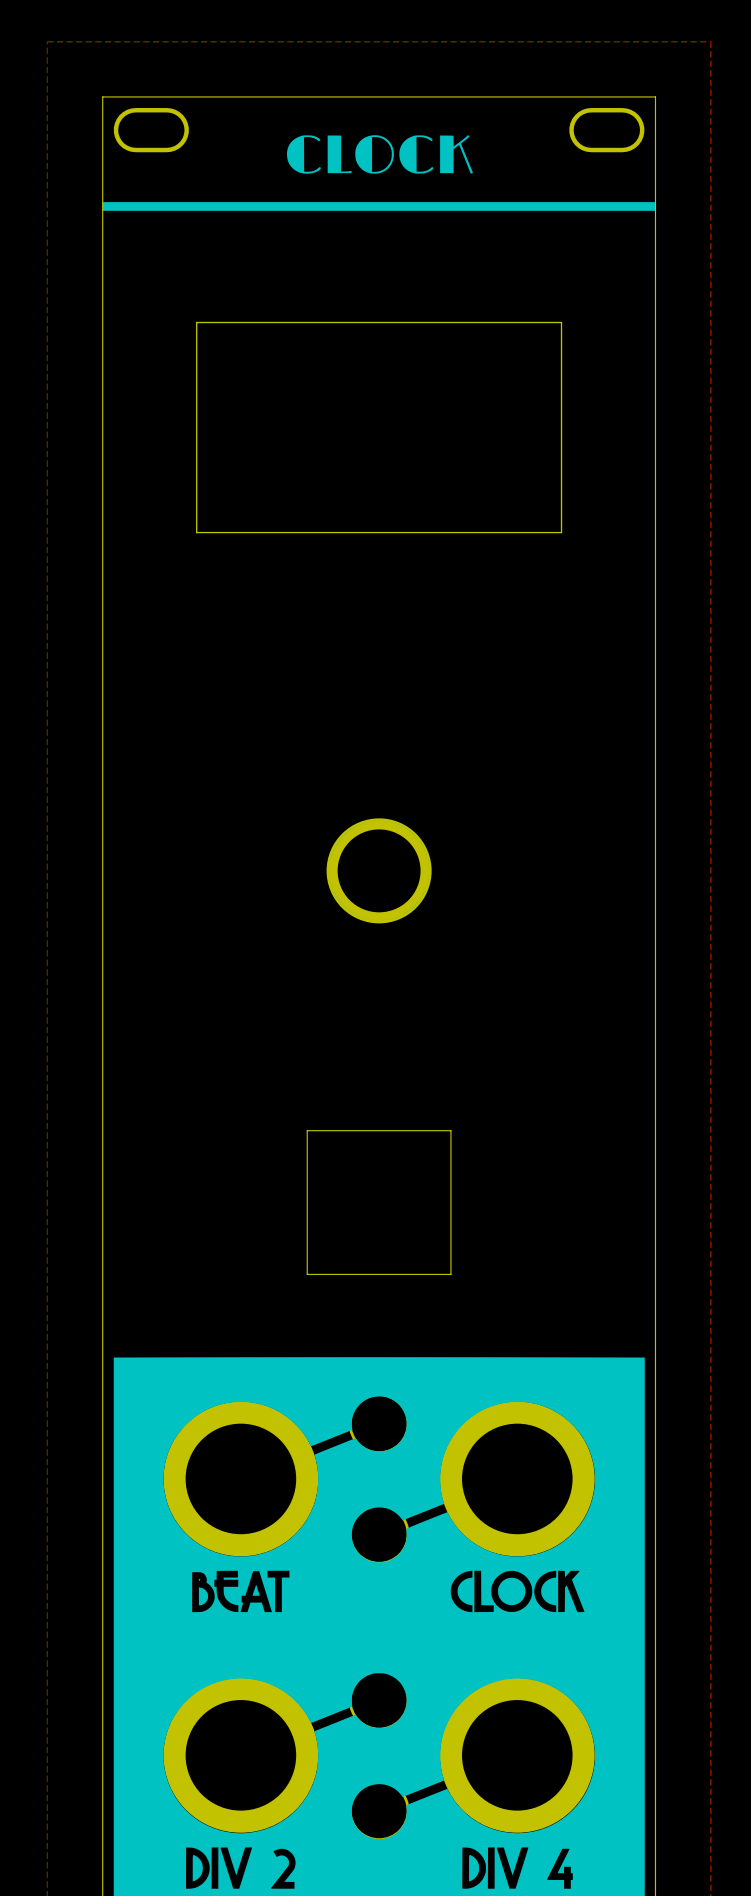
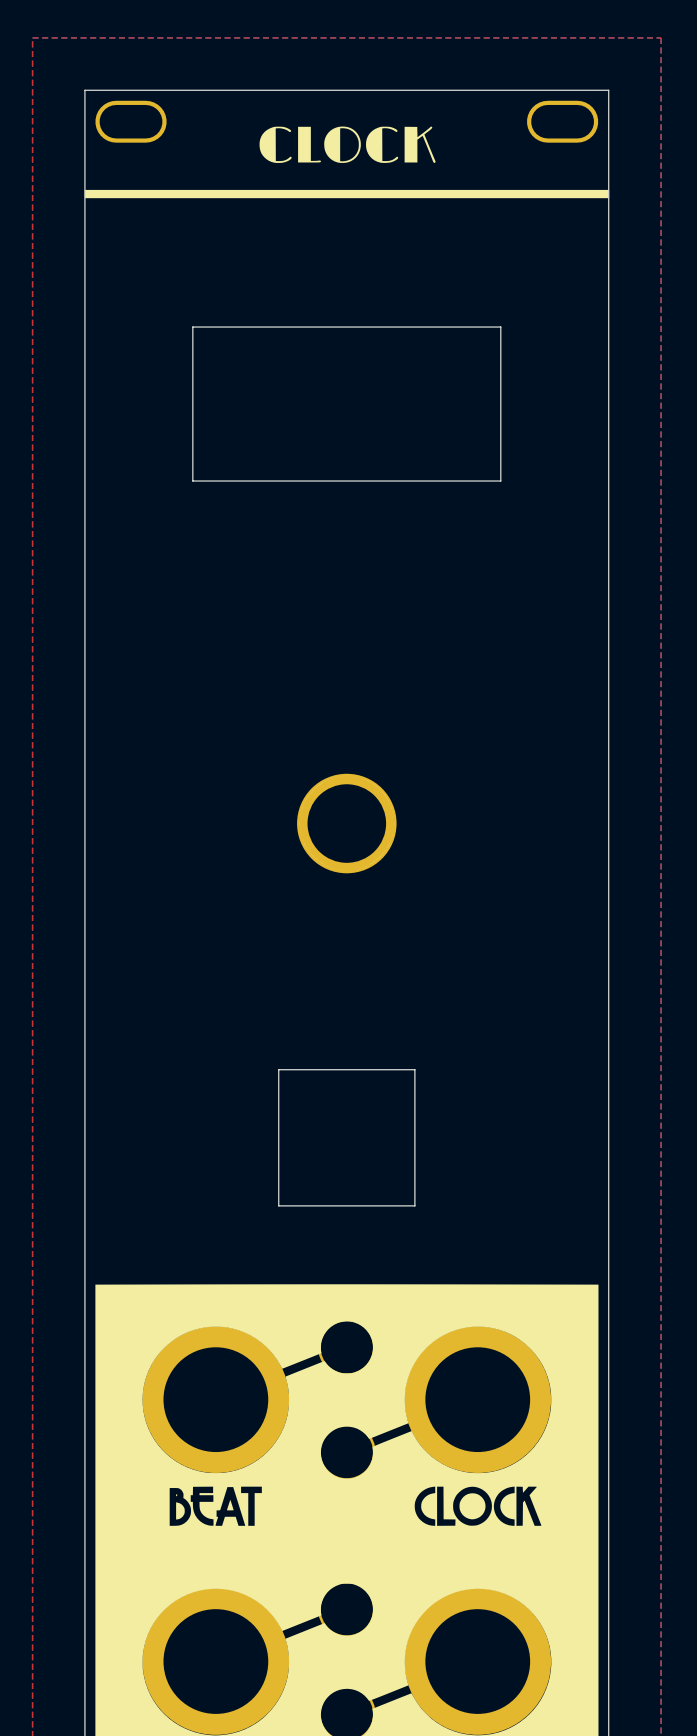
drawing: [196, 321, 563, 534] -> none
board edge: none -> (192, 327) (500, 327) (500, 481) (192, 481) (192, 327)

